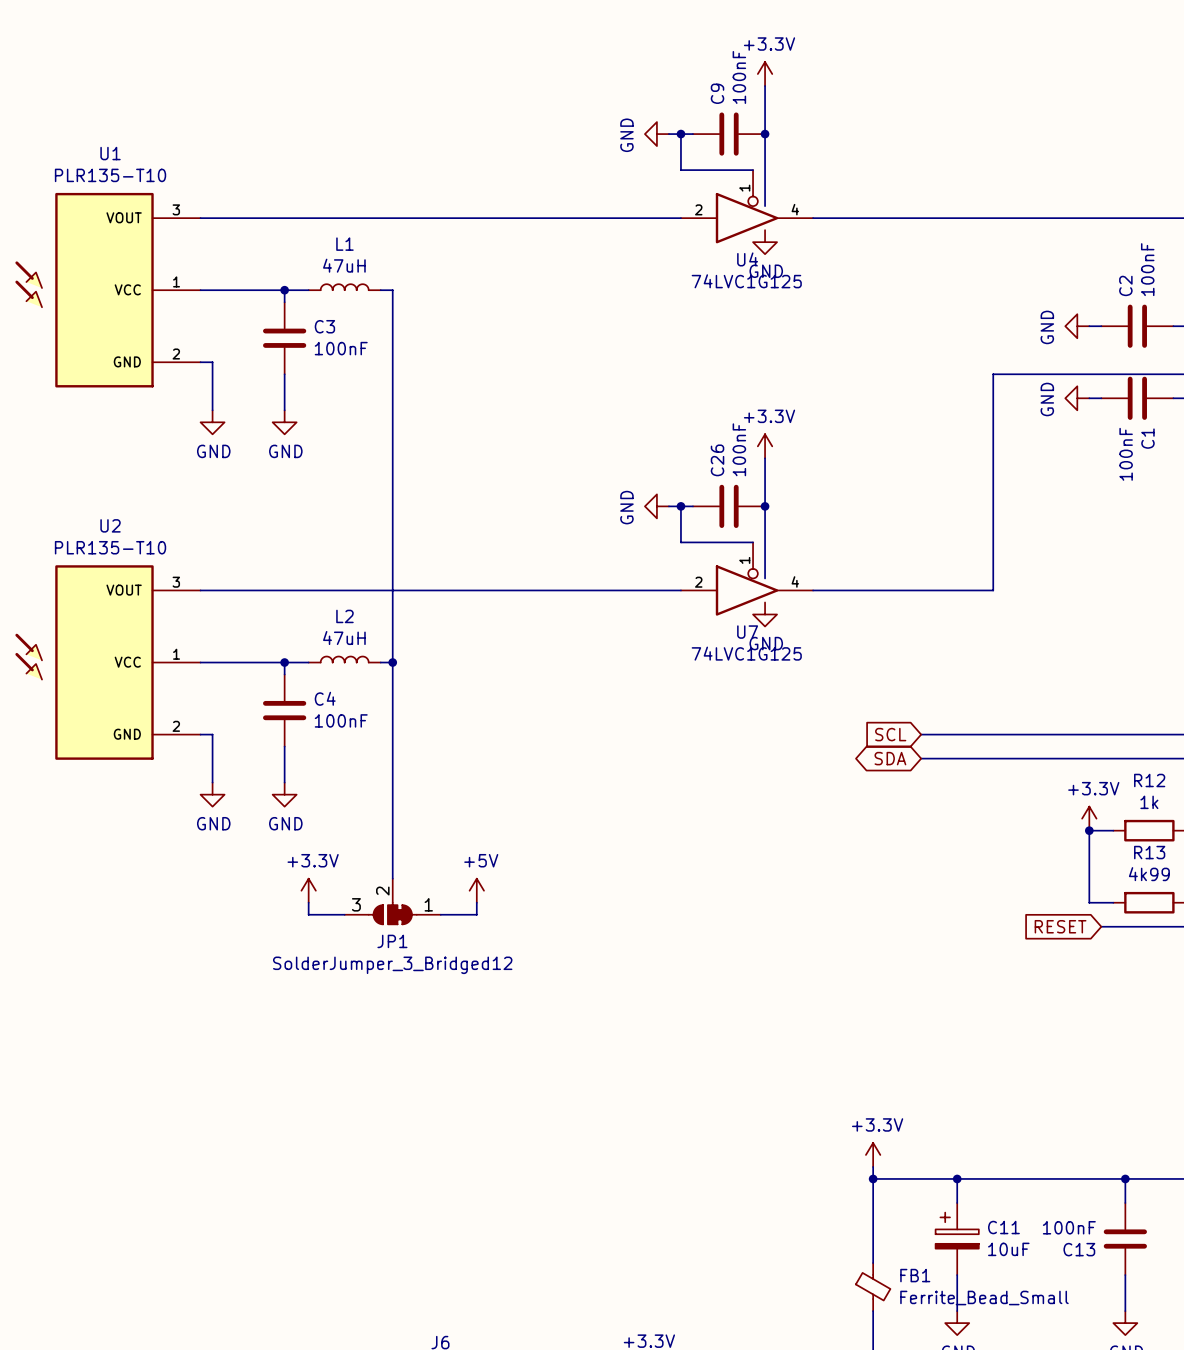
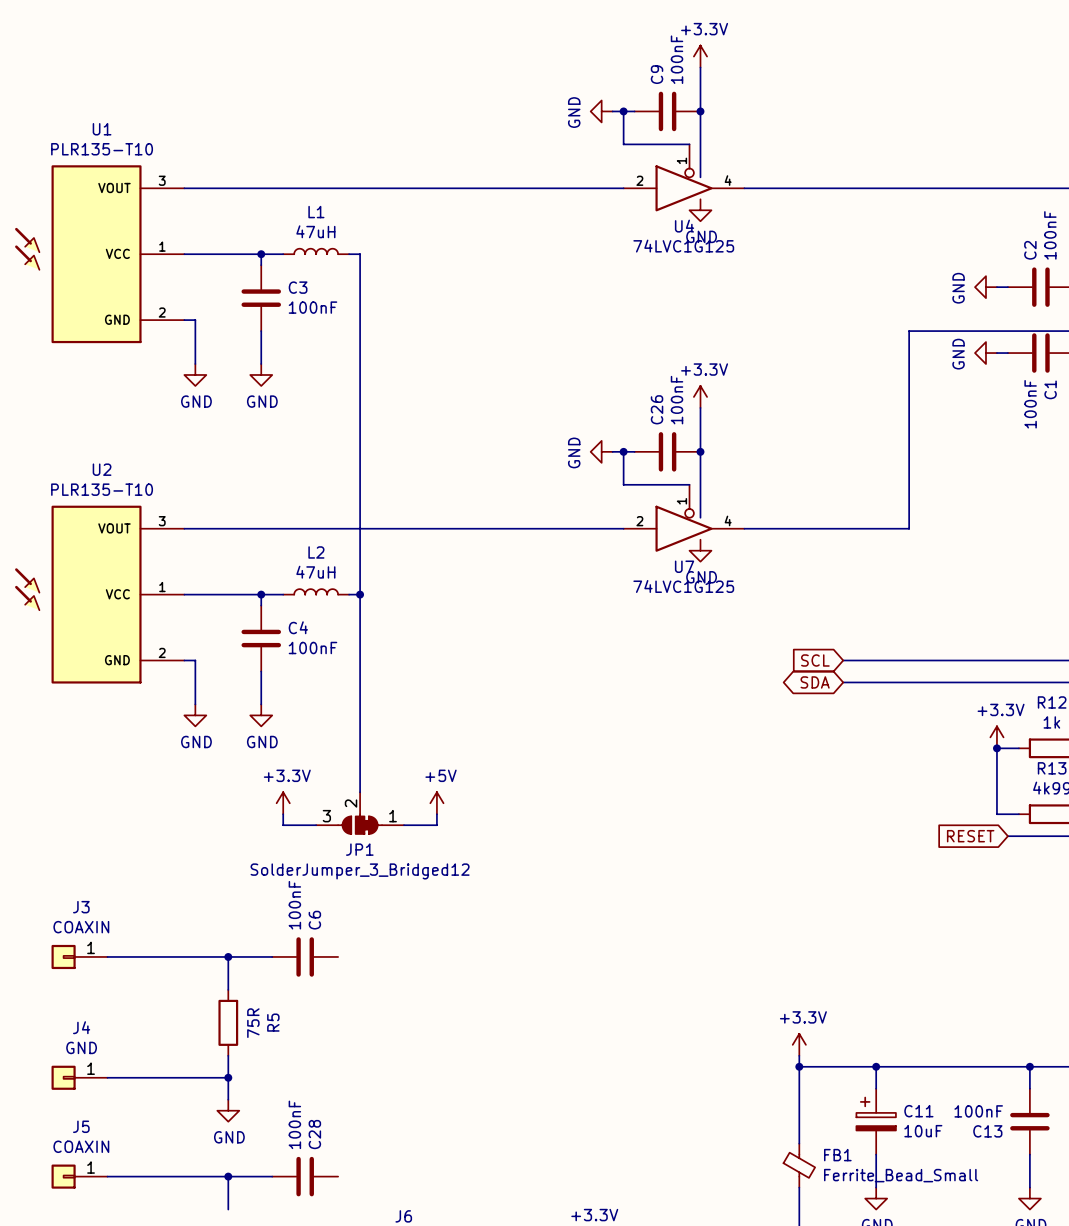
J3: none -> COAXIN (79, 956)
wire: none -> (107, 956) (272, 956)
wire: none -> (228, 956) (228, 989)
junction: none -> (228, 956)
C6: none -> 100nF (305, 956)
R5: none -> 75R (228, 1022)
wire: none -> (228, 1055) (228, 1099)
J4: none -> GND (79, 1077)
wire: none -> (107, 1077) (228, 1077)
junction: none -> (228, 1077)
power symbol: none -> GND (228, 1110)
J5: none -> COAXIN (79, 1176)
wire: none -> (107, 1176) (272, 1176)
wire: none -> (228, 1176) (228, 1209)
junction: none -> (228, 1176)
C28: none -> 100nF (305, 1176)

